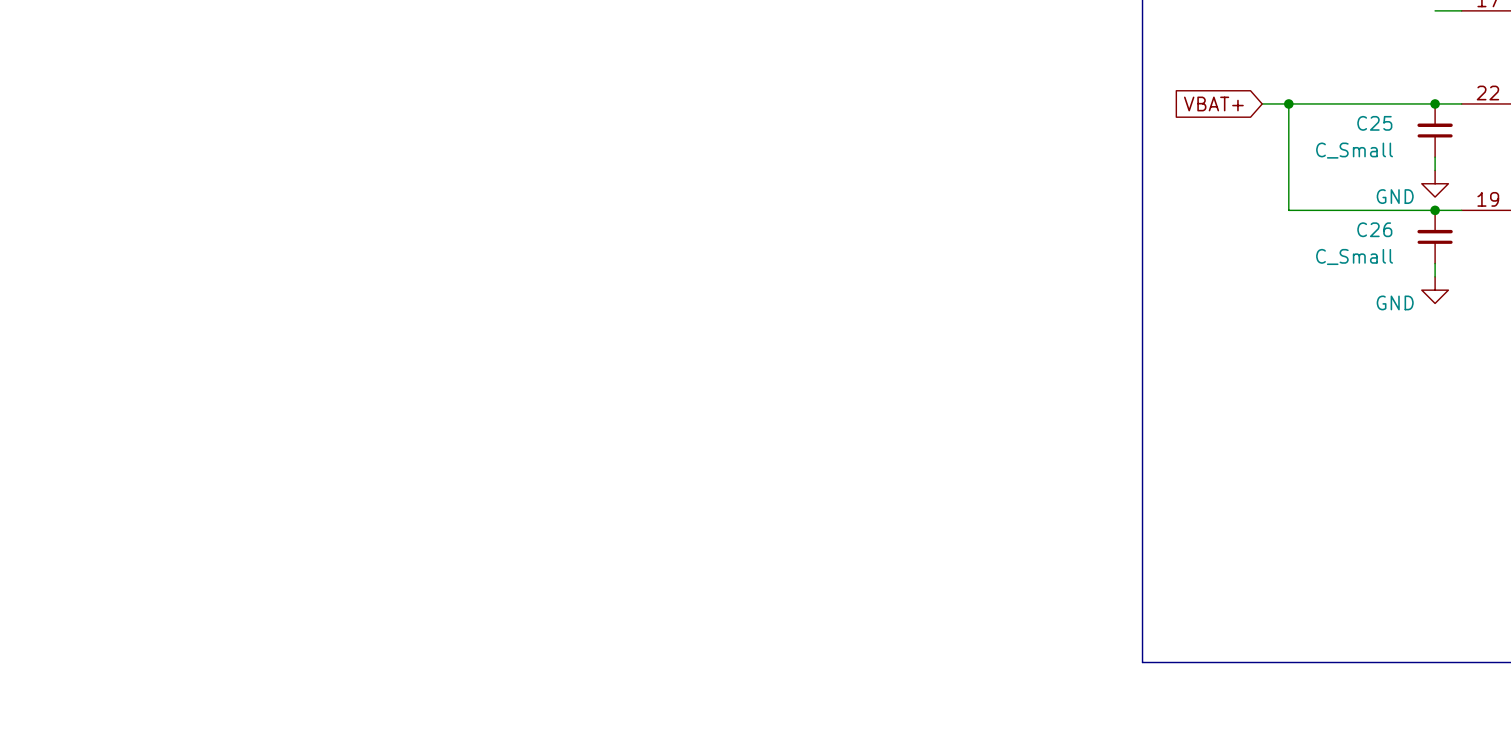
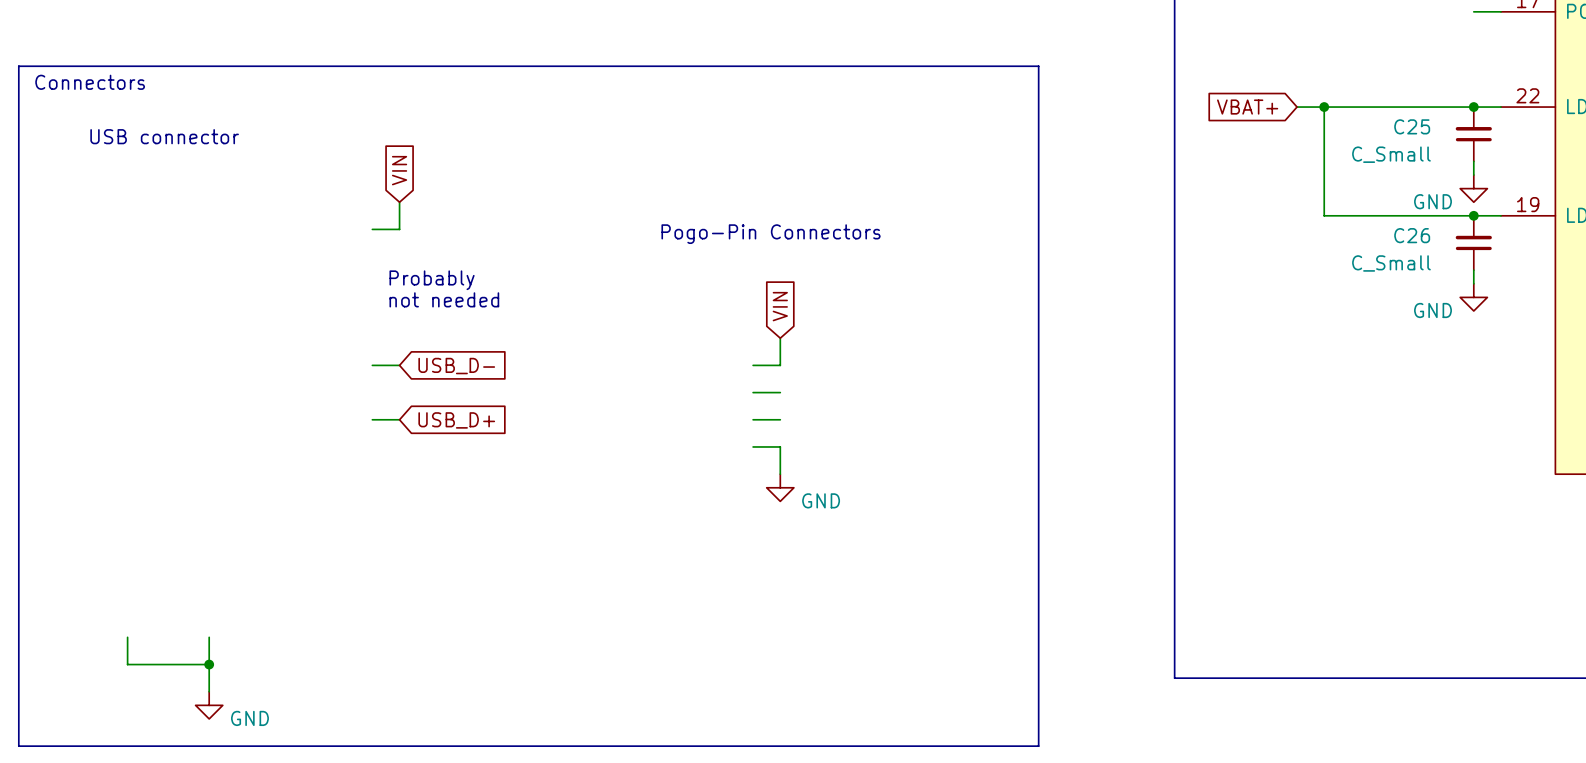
line: none -> (18, 66) (1038, 66) (1038, 746) (18, 746) (18, 66)
text: none -> Connectors (90, 82)
text: none -> USB connector (164, 136)
global label: none -> VIN (399, 170)
wire: none -> (399, 202) (399, 229) (372, 229)
text: none -> Pogo-Pin Connectors (771, 234)
text: none -> Probably (432, 280)
text: none -> not needed (444, 299)
global label: none -> VIN (780, 306)
wire: none -> (780, 338) (780, 365) (753, 365)
wire: none -> (372, 365) (399, 365)
global label: none -> USB_D- (456, 366)
wire: none -> (753, 392) (780, 392)
wire: none -> (372, 419) (399, 419)
wire: none -> (753, 419) (780, 419)
global label: none -> USB_D+ (456, 420)
wire: none -> (753, 446) (780, 446) (780, 474)
power symbol: none -> GND (780, 487)
wire: none -> (127, 637) (127, 664) (209, 664)
wire: none -> (209, 637) (209, 691)
junction: none -> (209, 664)
power symbol: none -> GND (209, 705)

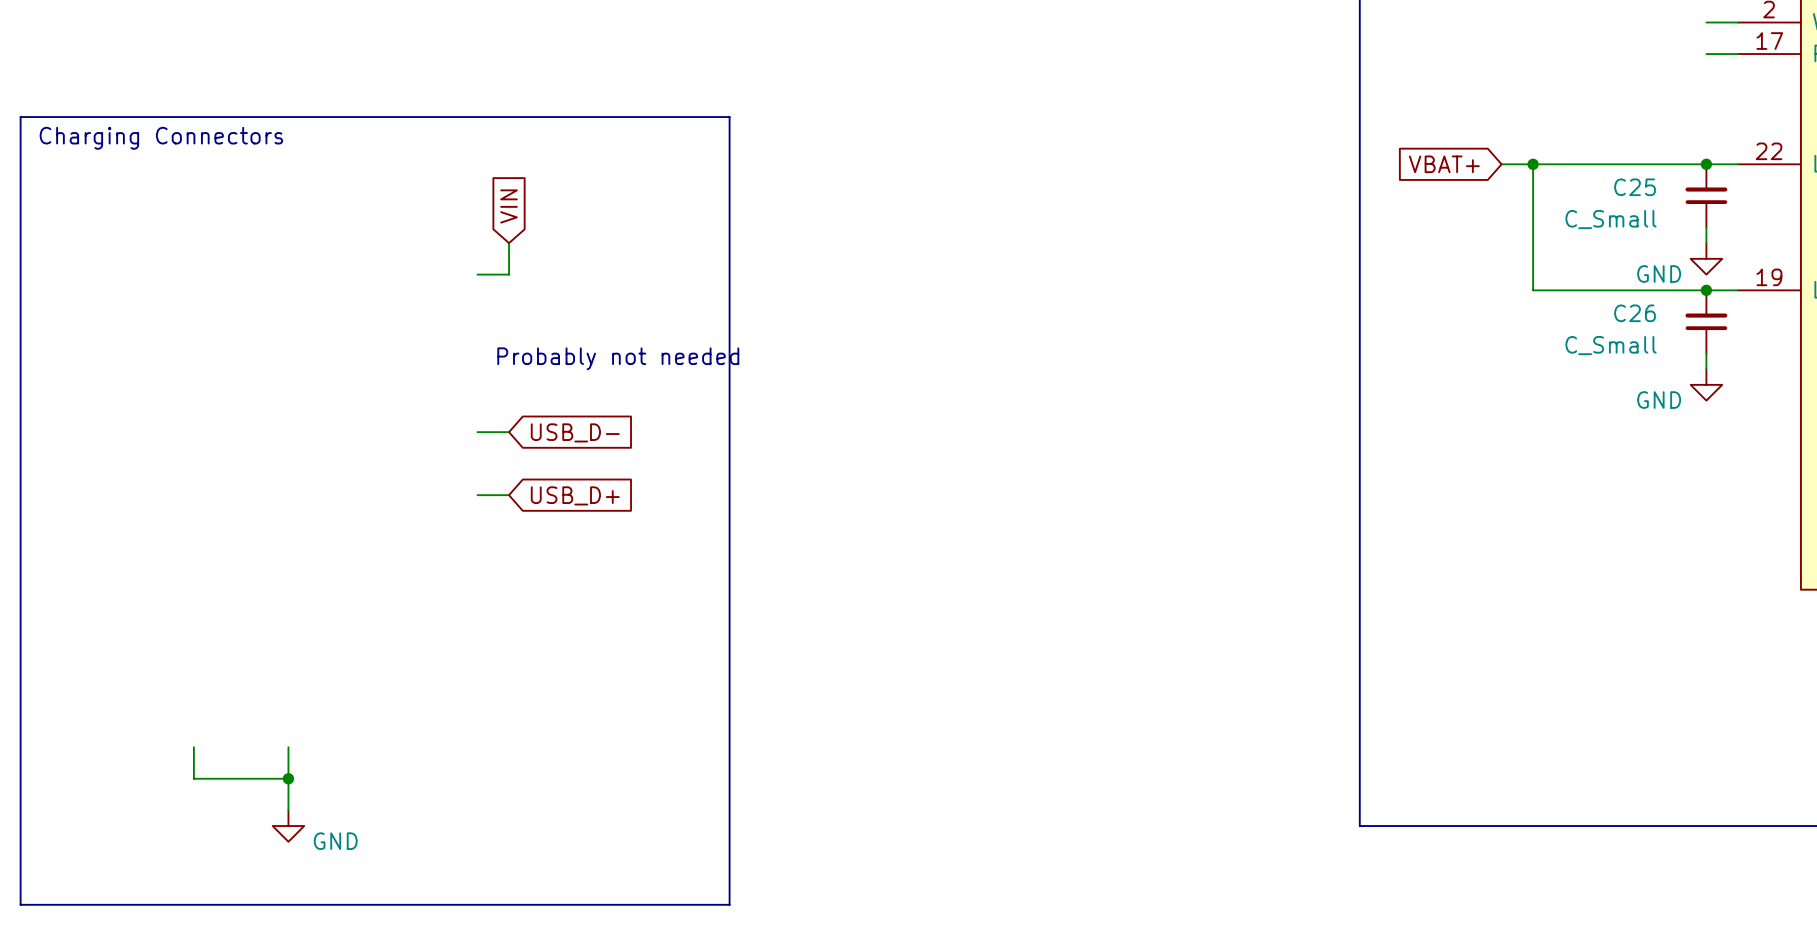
line: (630, 66) (1038, 66) (1038, 746) (630, 746) -> (729, 117) (729, 904)
text: Connectors (90, 82) -> Charging Connectors (161, 138)
text: USB connector (164, 136) -> none
global label position: VIN (399, 170) -> VIN (509, 206)
wire: (399, 202) (399, 229) (372, 229) -> (509, 243) (509, 274) (477, 274)
text: Pogo-Pin Connectors (771, 234) -> none
text: Probably (432, 280) -> none
text: not needed (444, 299) -> Probably not needed (618, 358)
global label: VIN (780, 306) -> none
wire: (780, 338) (780, 365) (753, 365) -> none
wire: (372, 365) (399, 365) -> (477, 432) (509, 432)
global label position: USB_D- (456, 366) -> USB_D- (575, 432)
wire: (753, 392) (780, 392) -> none
wire: (372, 419) (399, 419) -> (477, 495) (509, 495)
wire: (753, 419) (780, 419) -> none
global label position: USB_D+ (456, 420) -> USB_D+ (575, 495)
wire: (753, 446) (780, 446) (780, 474) -> none
power symbol: GND (780, 487) -> none
wire: (127, 637) (127, 664) (209, 664) -> (193, 747) (193, 778) (288, 778)
wire: (209, 637) (209, 691) -> (288, 747) (288, 810)
junction position: (209, 664) -> (288, 778)
power symbol position: GND (209, 705) -> GND (288, 826)

